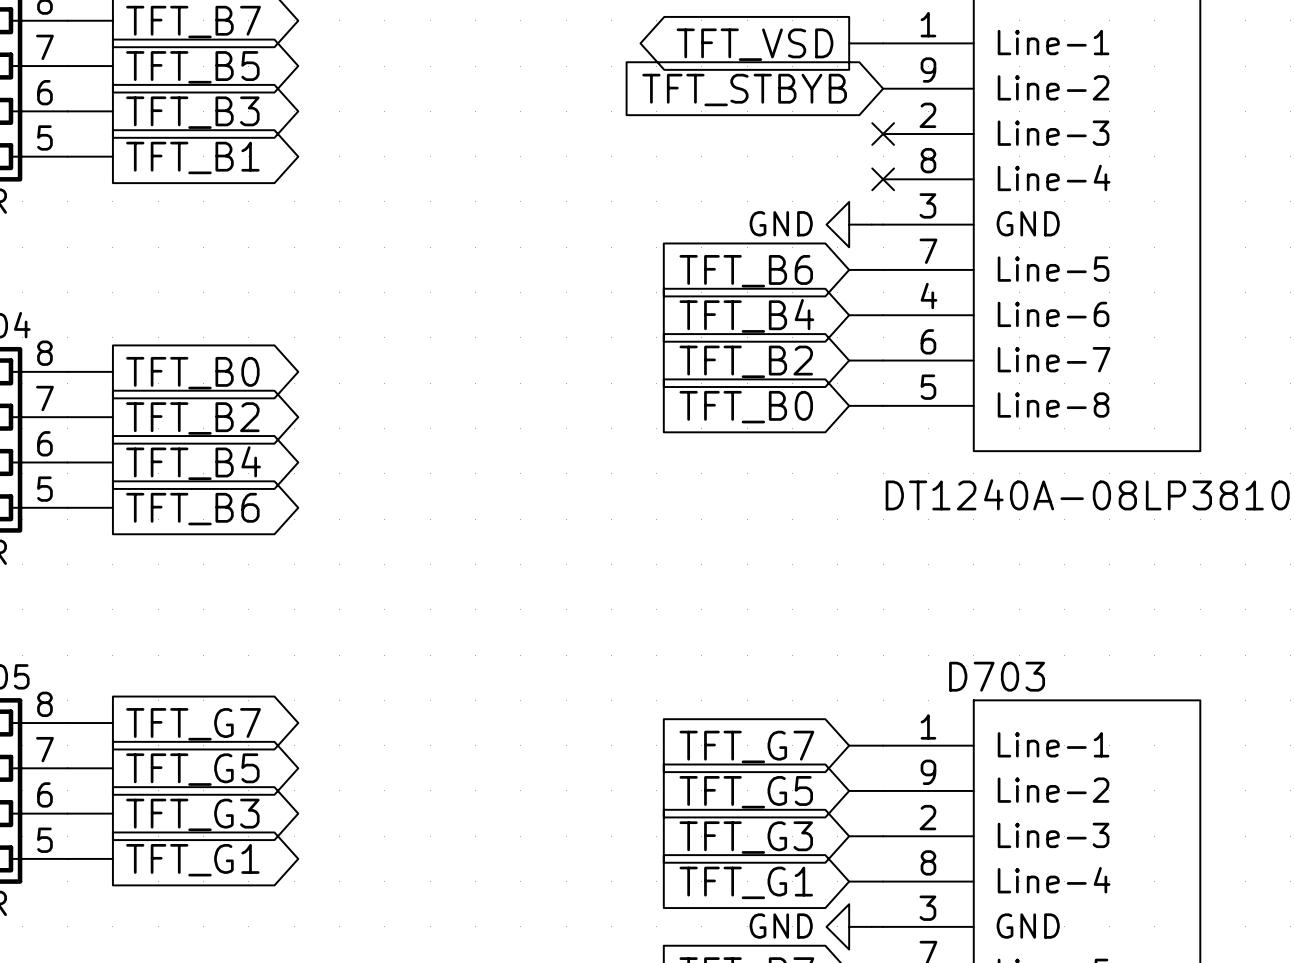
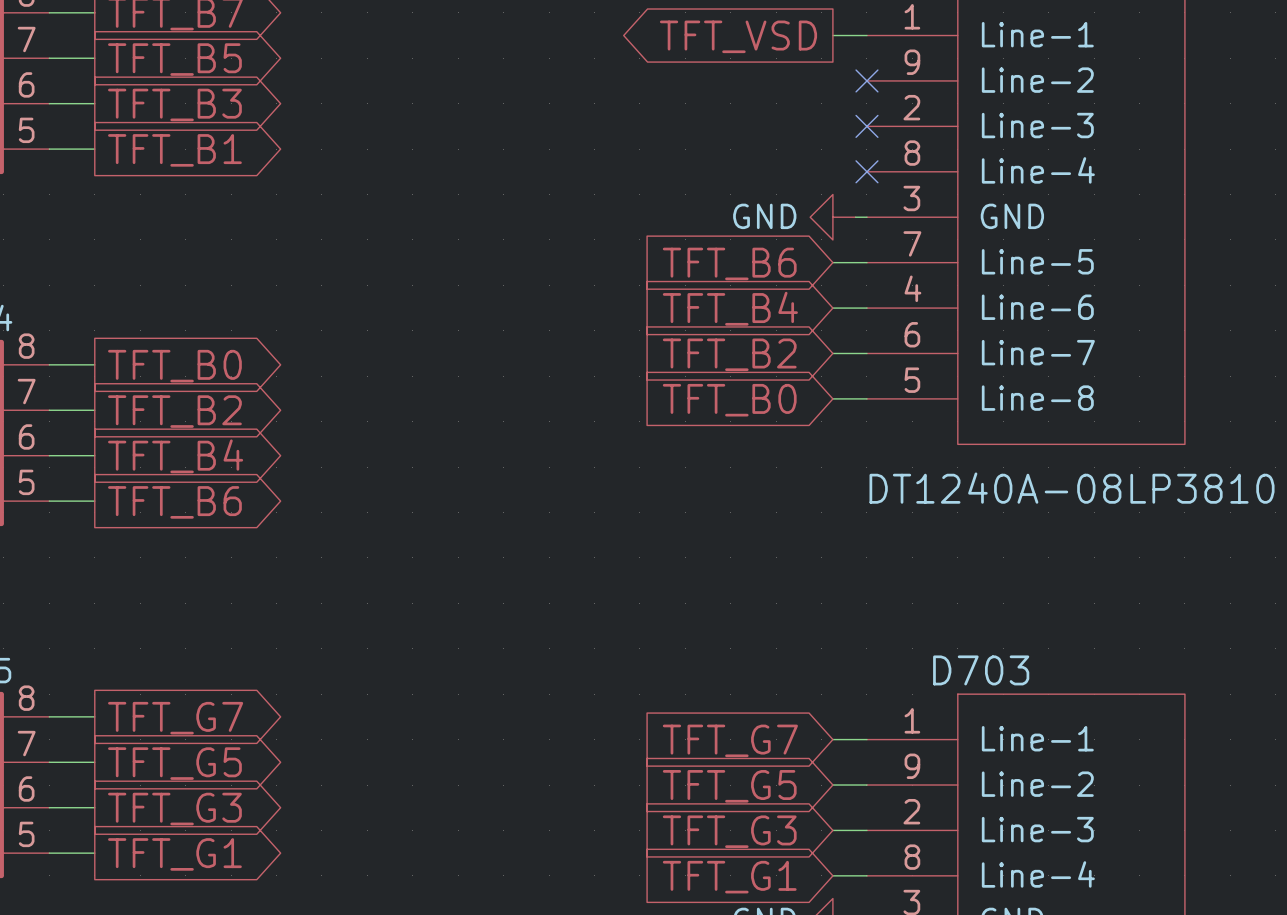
no-connect mark: none -> (866, 80)
global label: TFT_STBYB (744, 90) -> none

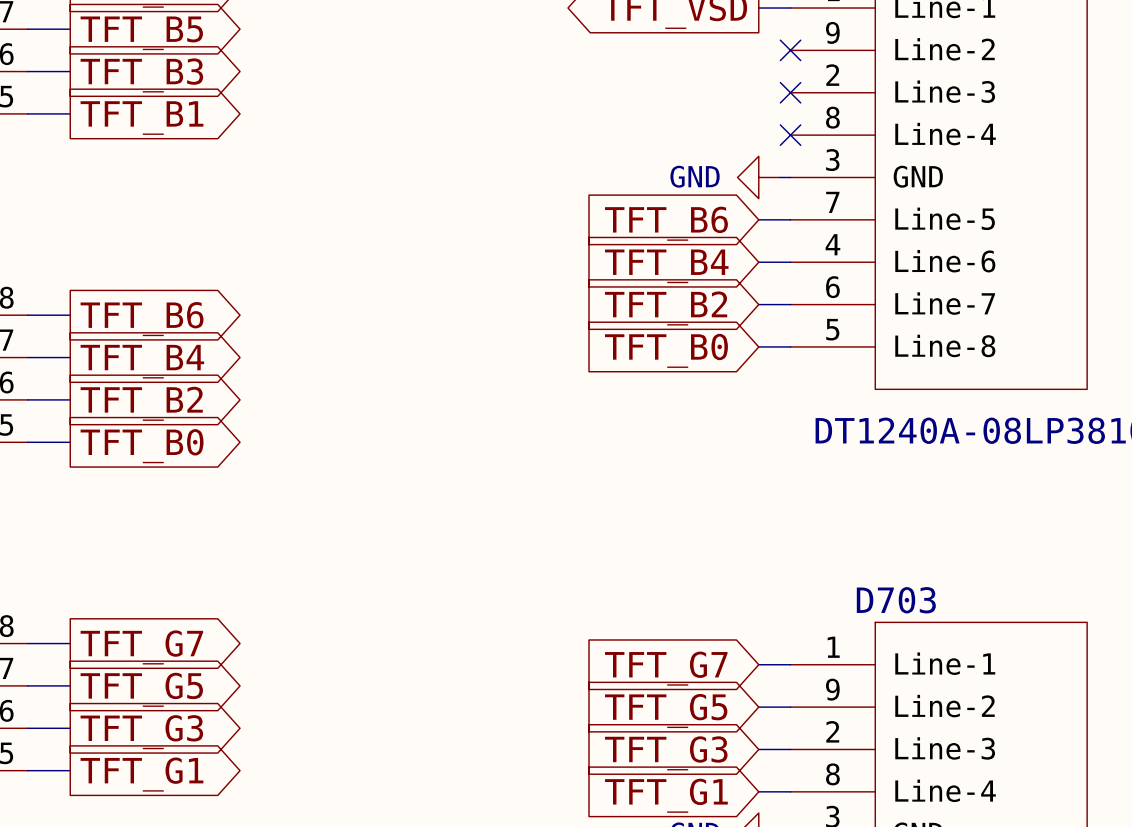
global label: TFT_B0 (174, 366) -> TFT_B6 (142, 319)
global label: TFT_B2 (174, 411) -> TFT_B4 (142, 361)
global label: TFT_B4 (175, 456) -> TFT_B2 (141, 403)
global label: TFT_B6 (174, 502) -> TFT_B0 (142, 446)

